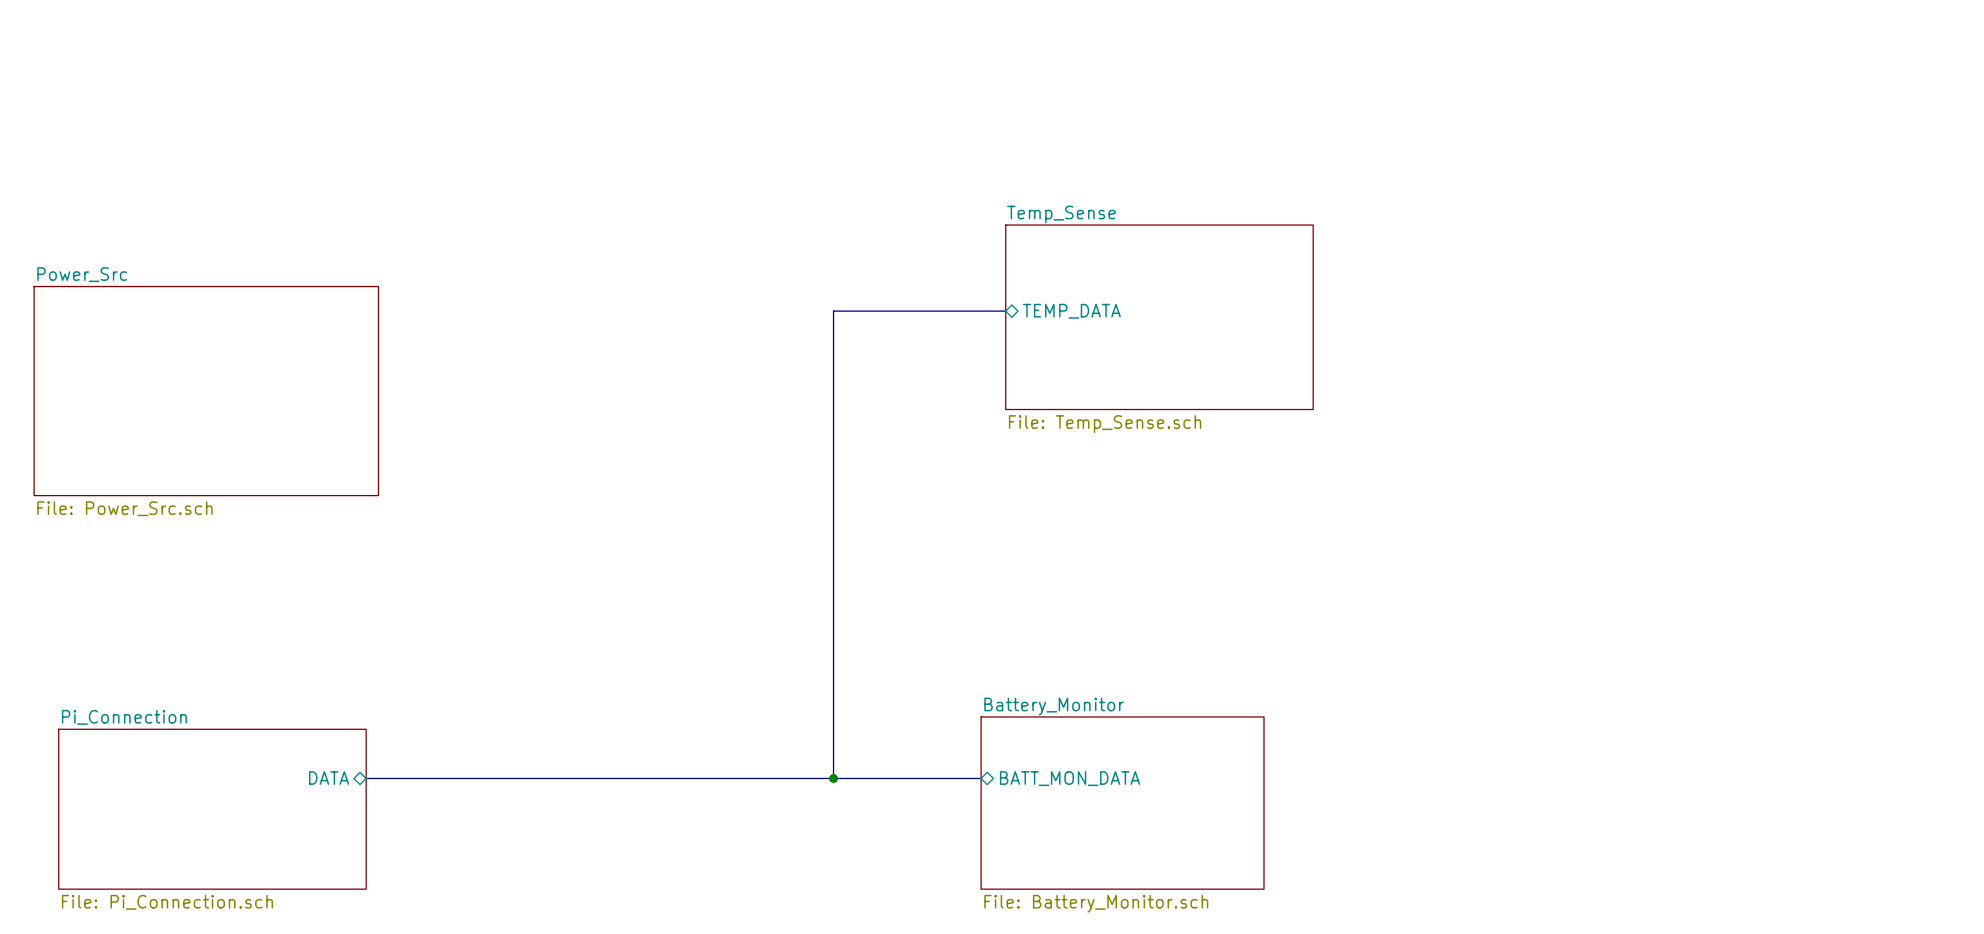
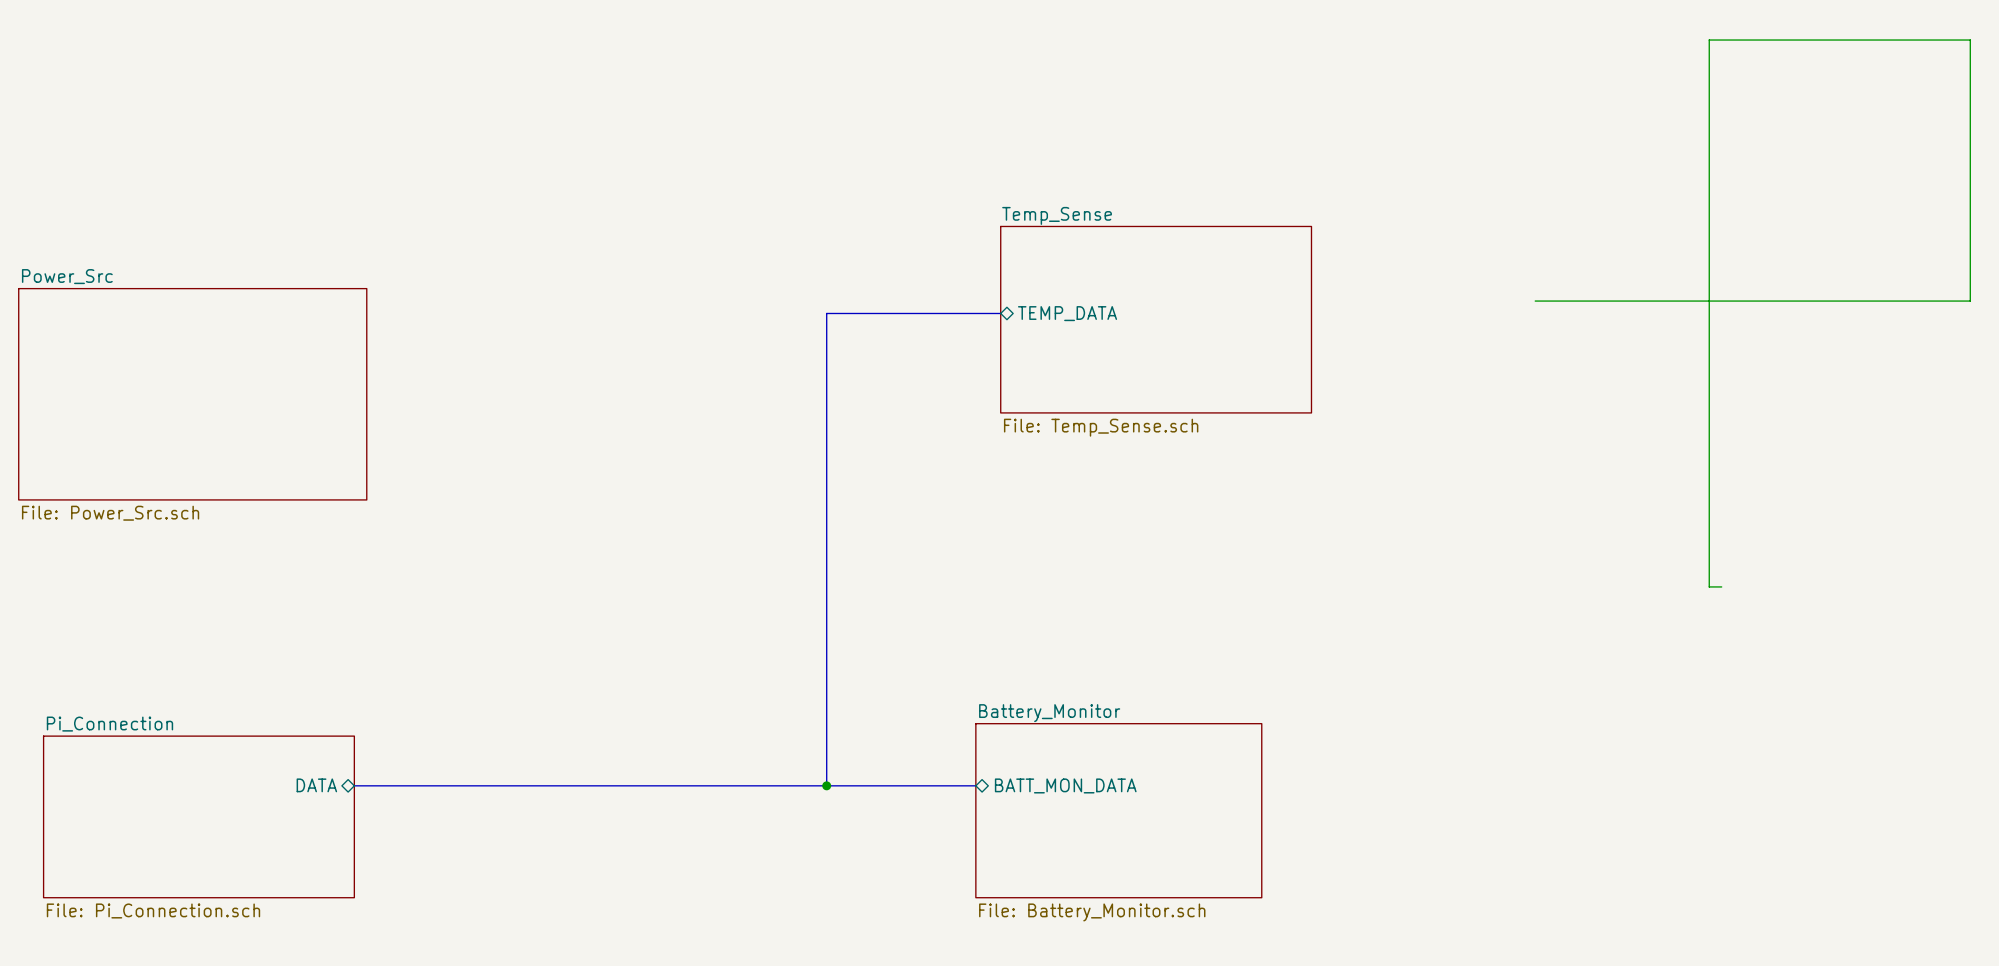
wire: none -> (1535, 301) (1970, 301) (1970, 40) (1709, 40) (1709, 586) (1721, 586)

